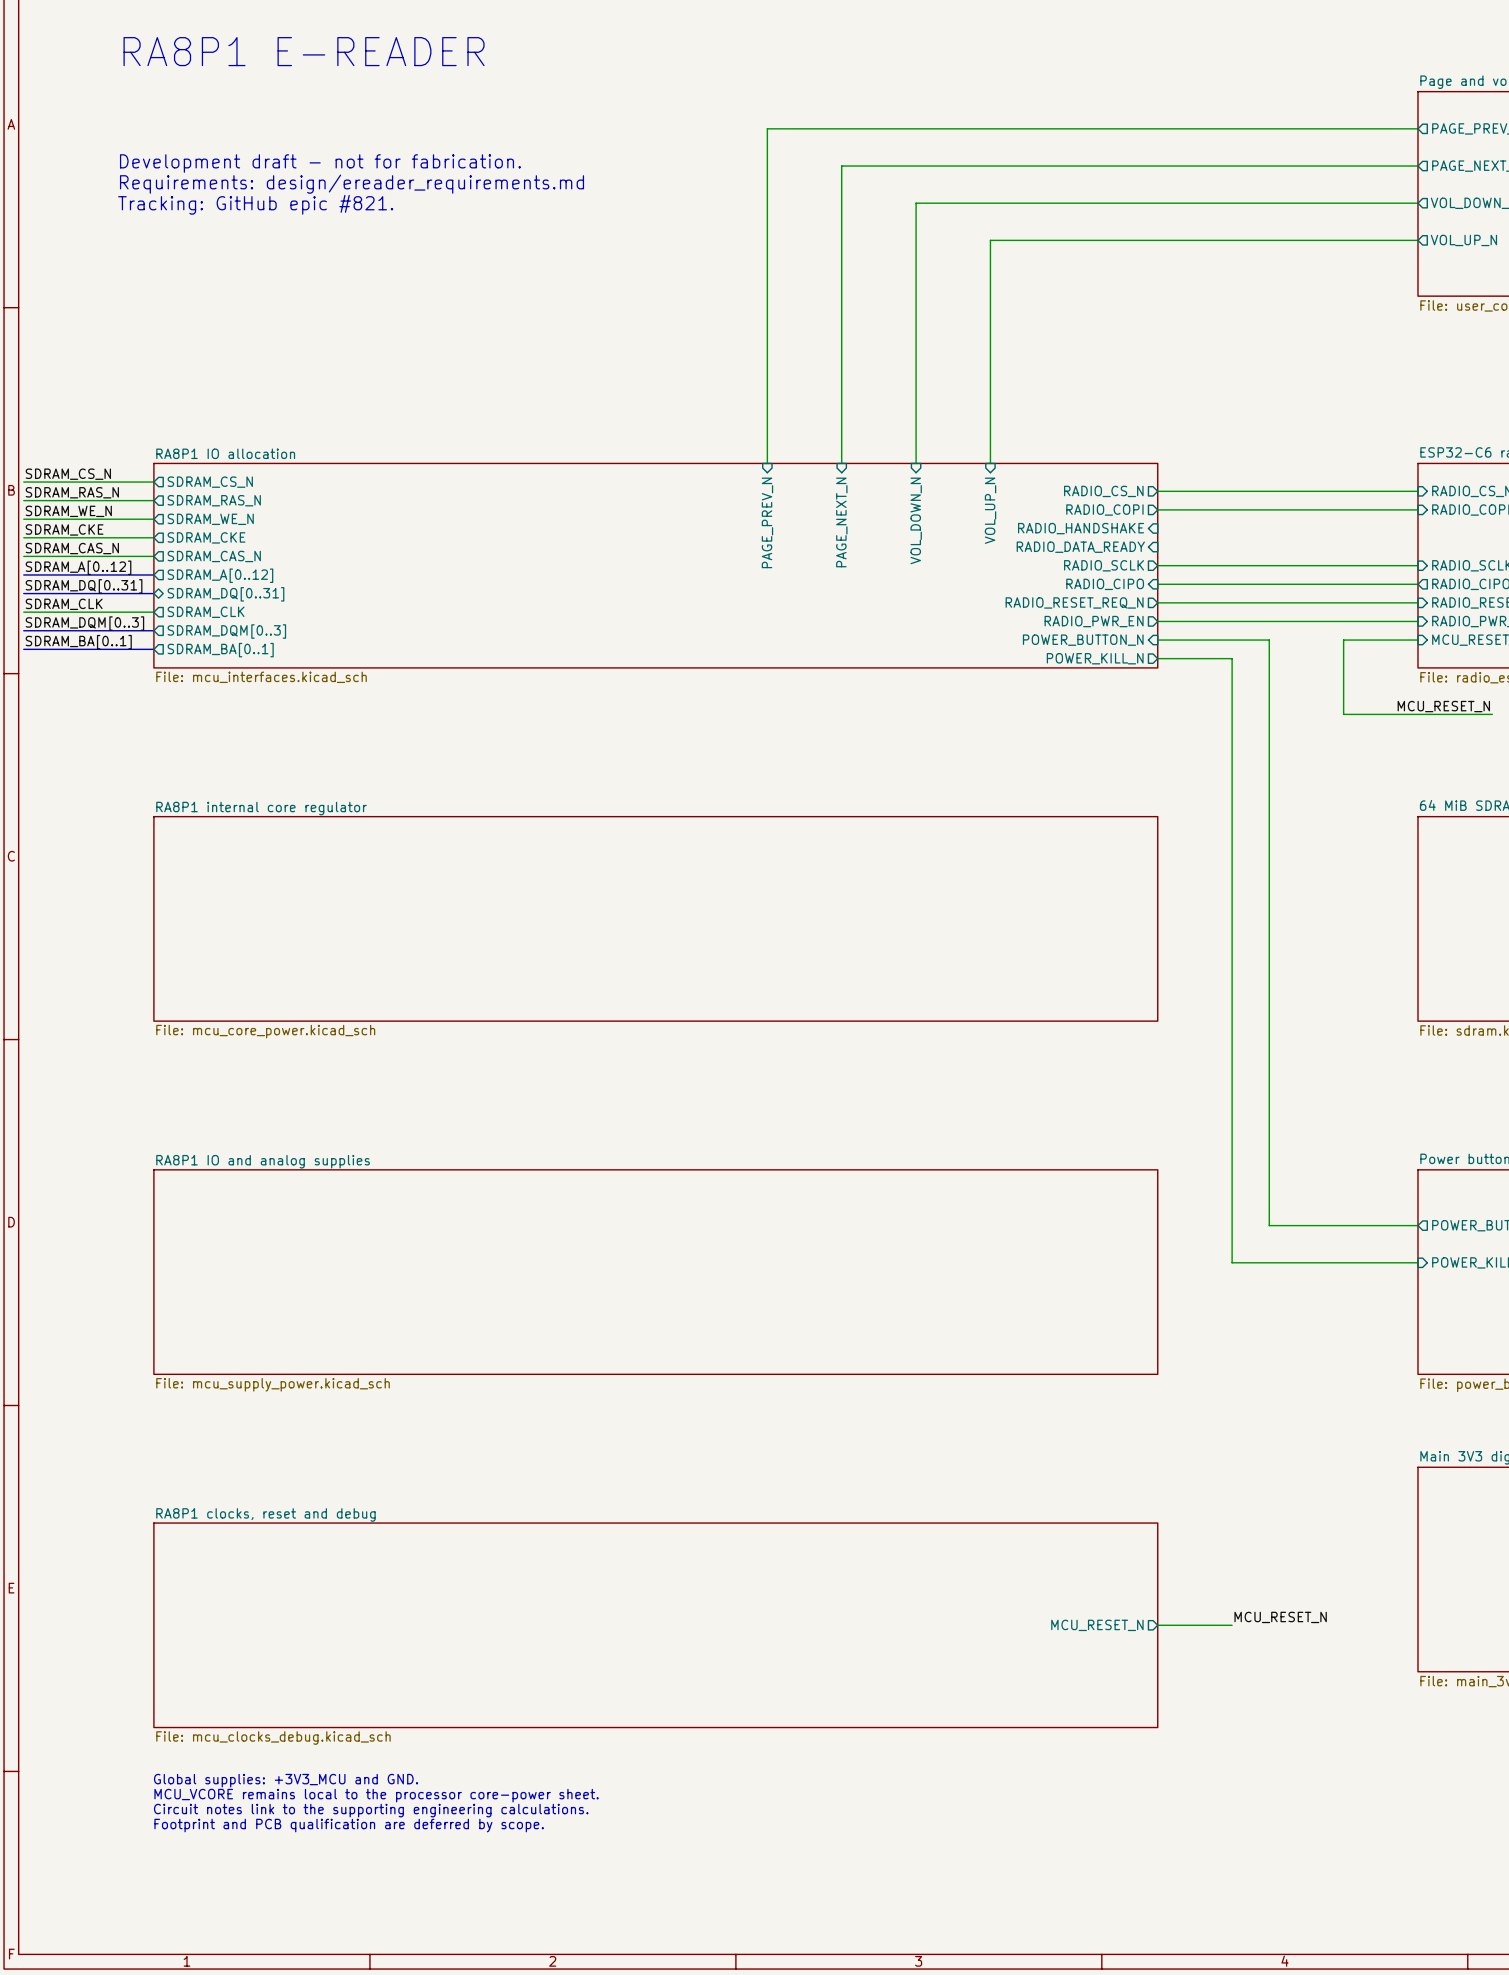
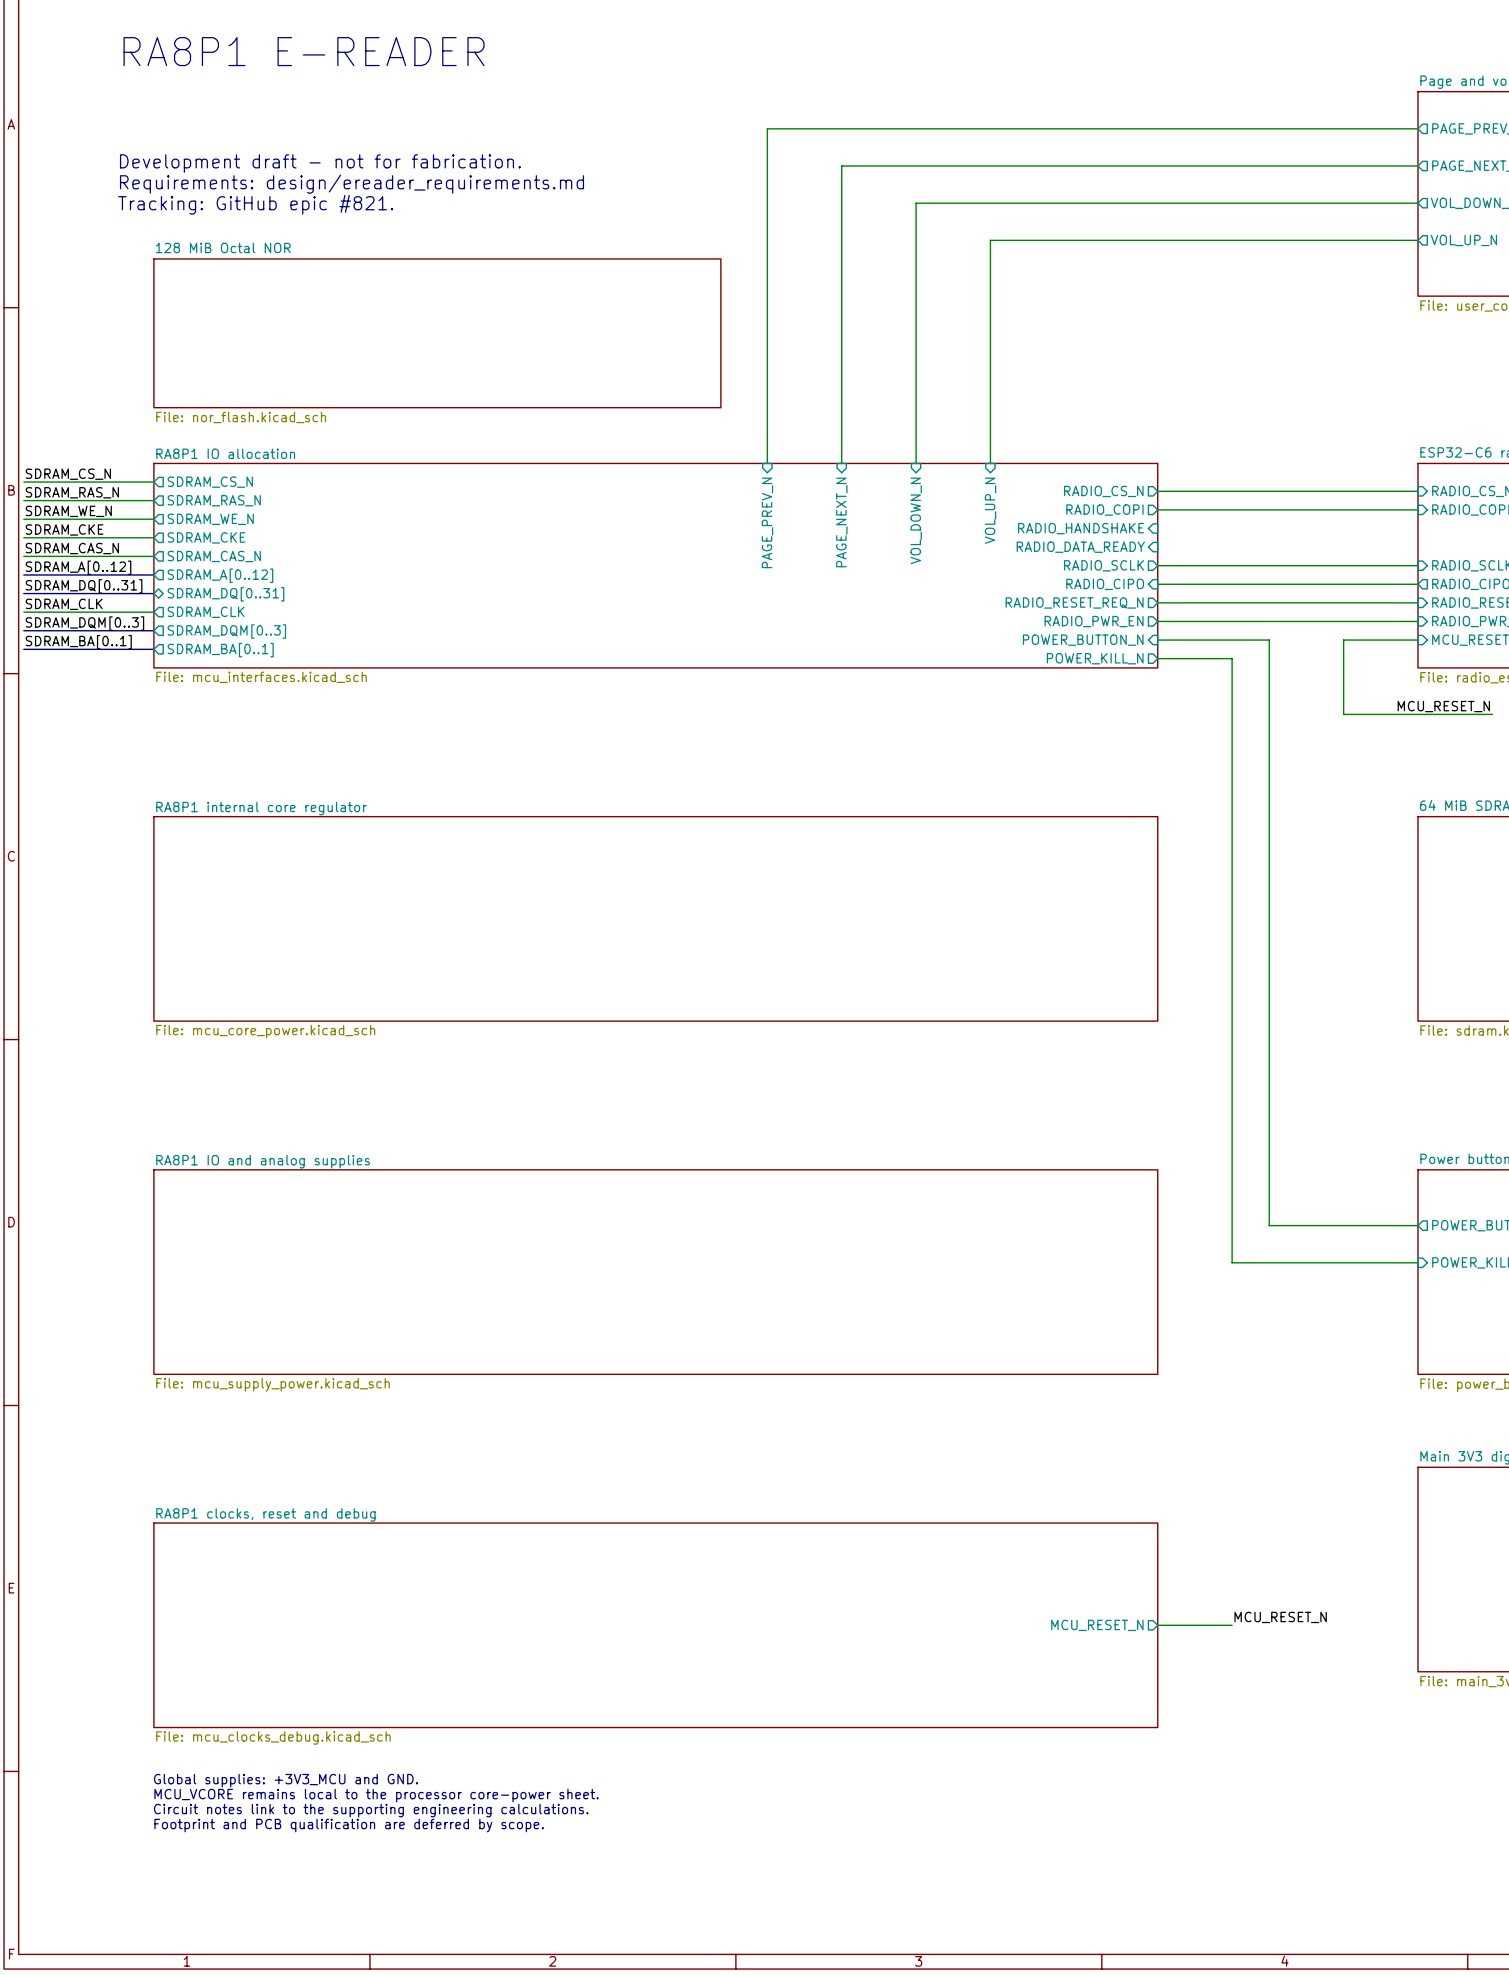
sheet 128 MiB Octal NOR: none -> File: nor_flash.kicad_sch (437, 333)

